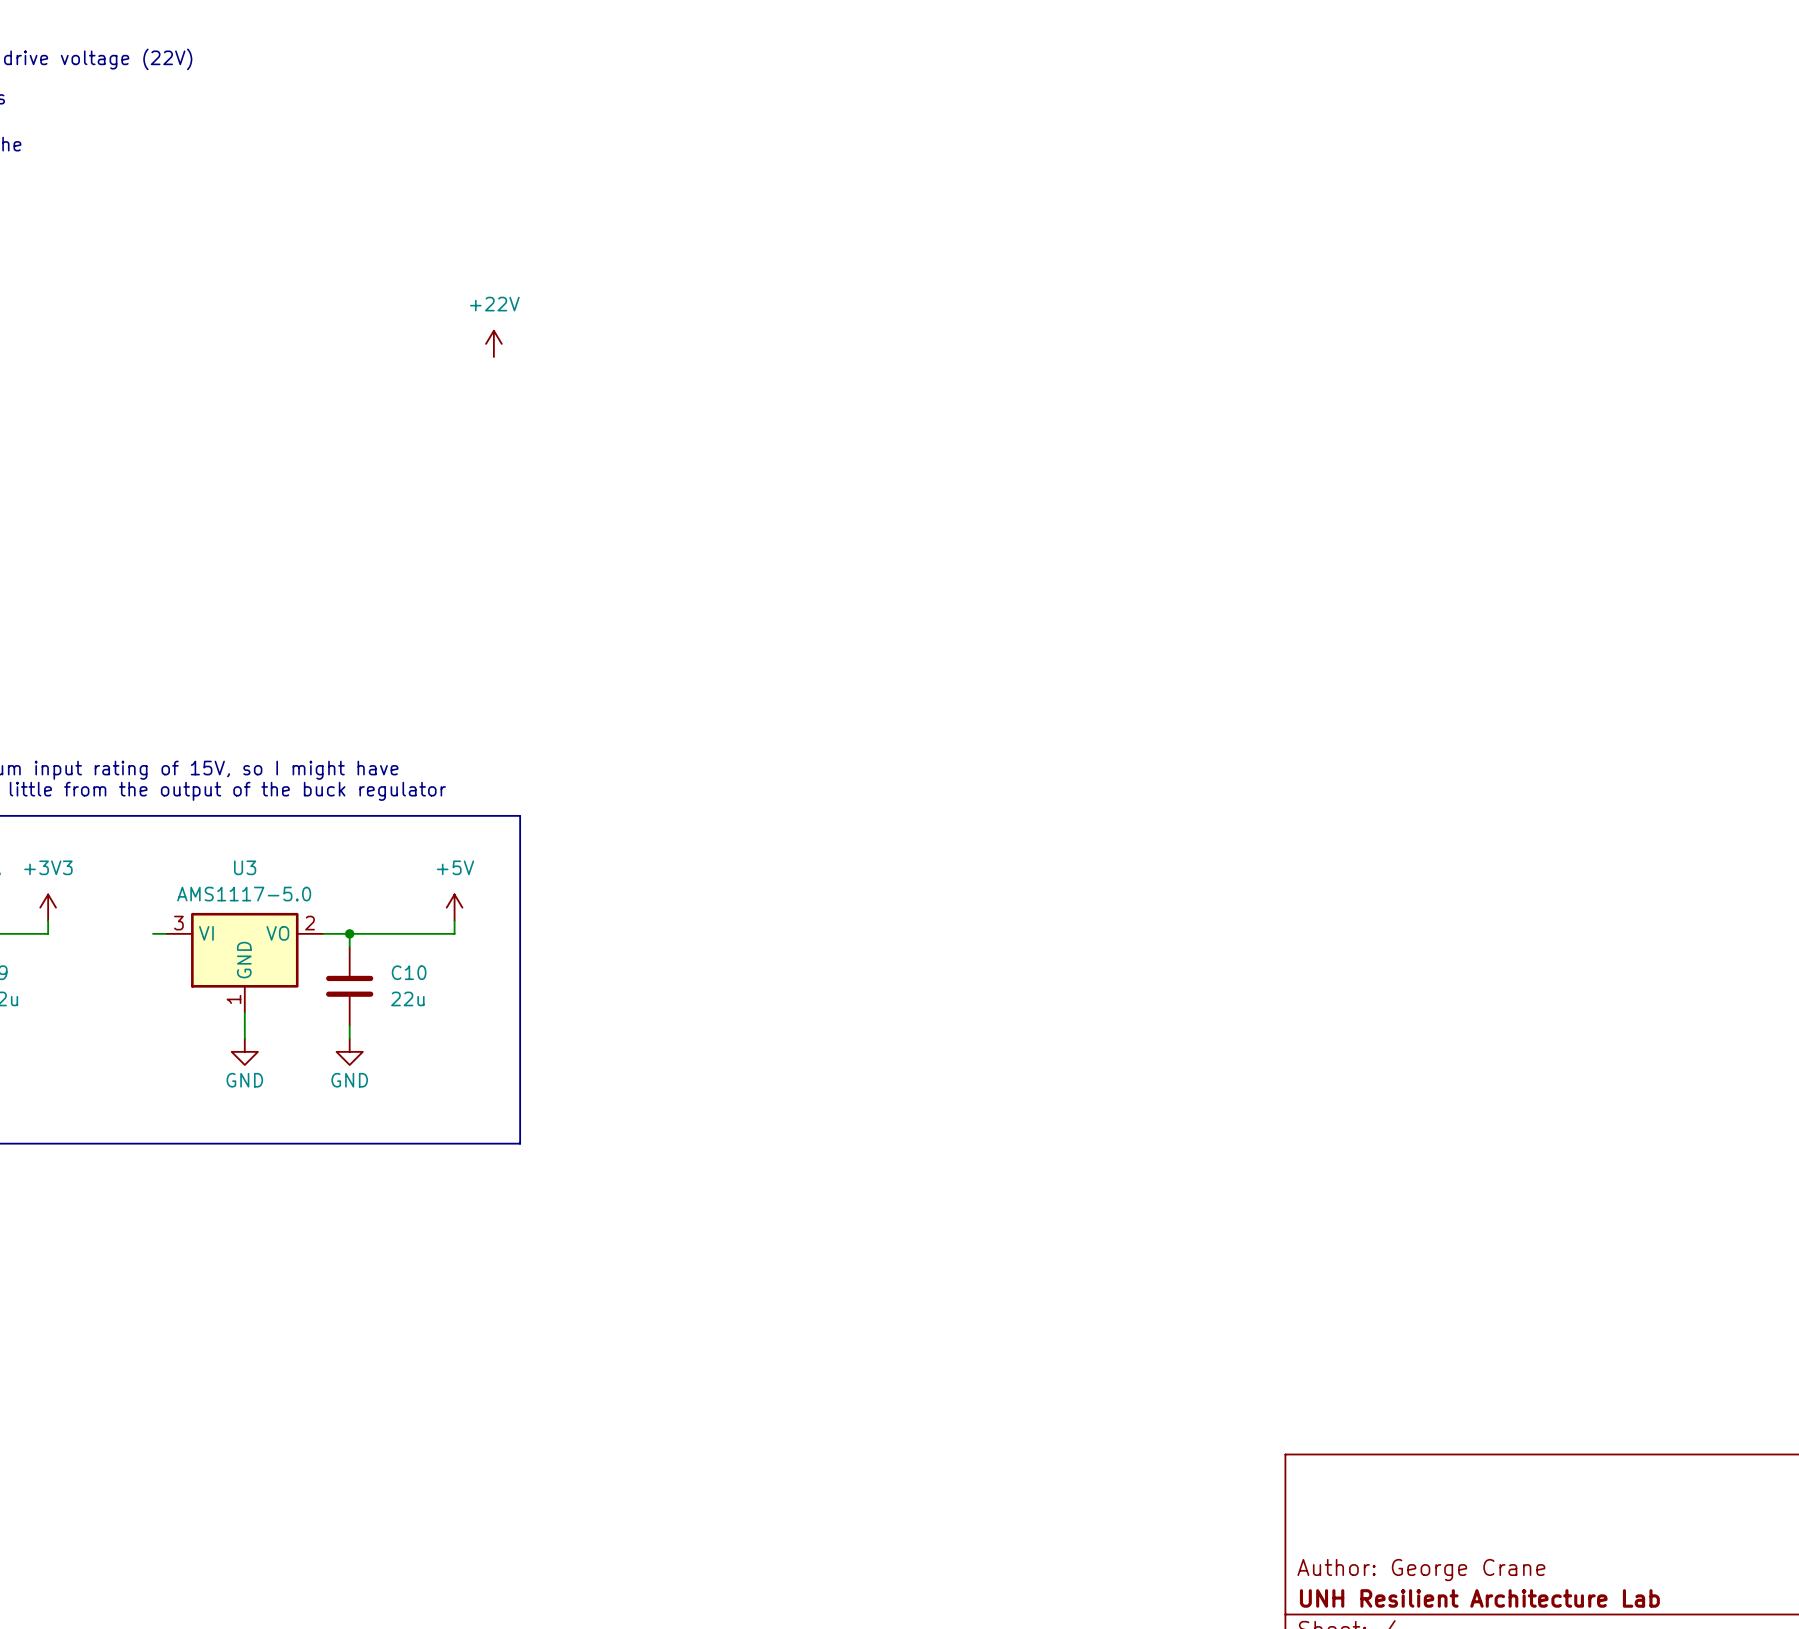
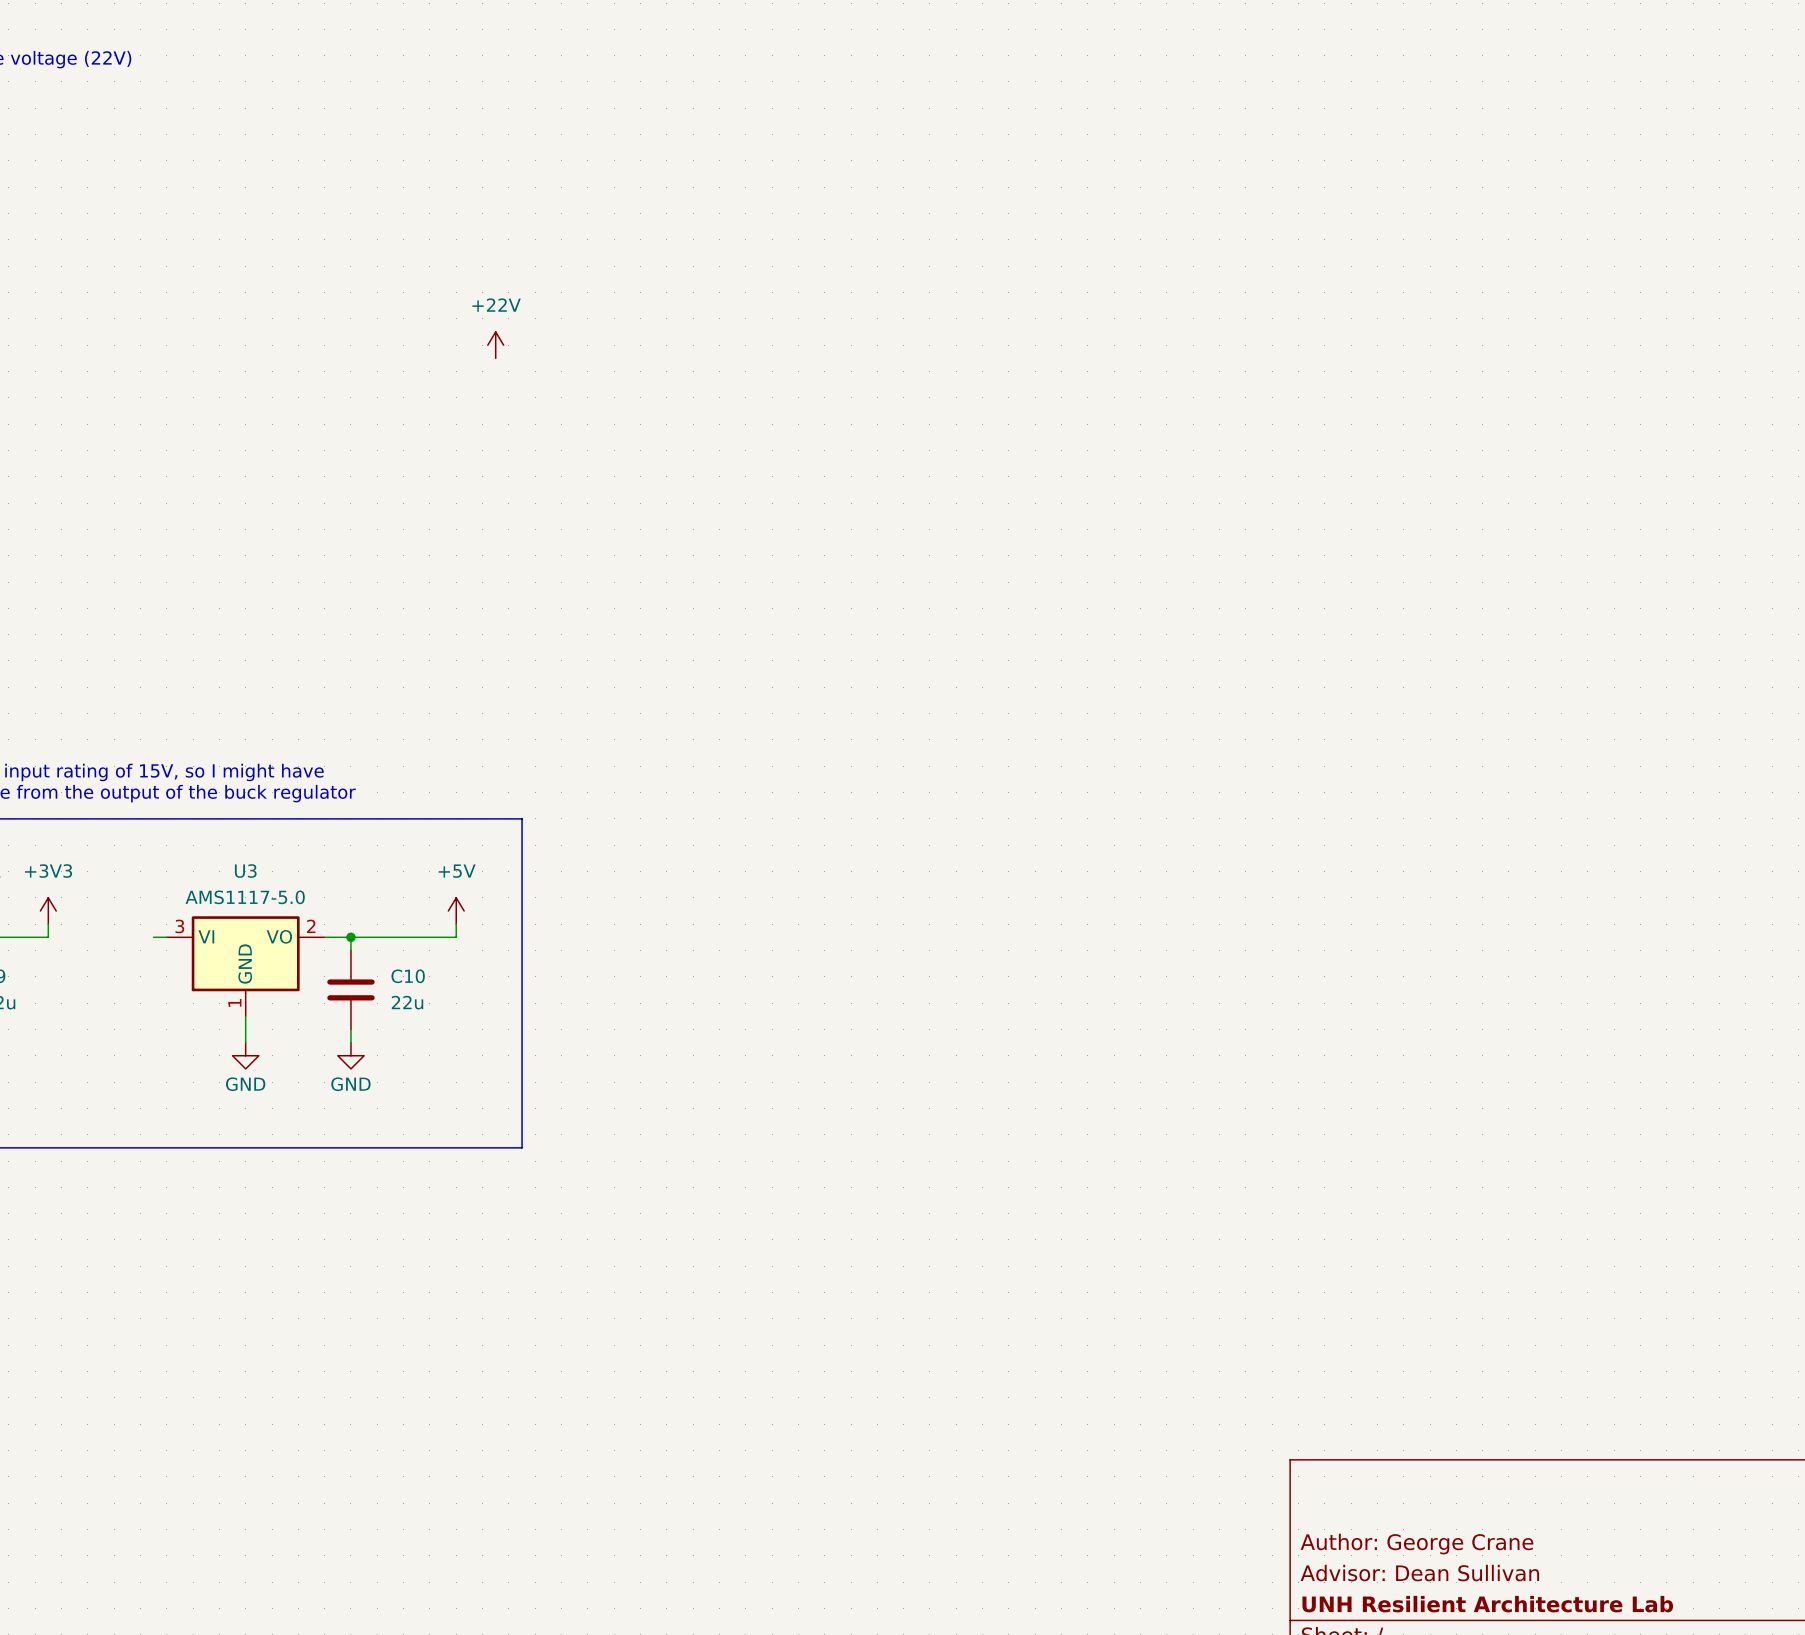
title block: none -> Author: George Crane (1416, 1544)
title block: Author: George Crane (1421, 1570) -> Advisor: Dean Sullivan (1419, 1573)

